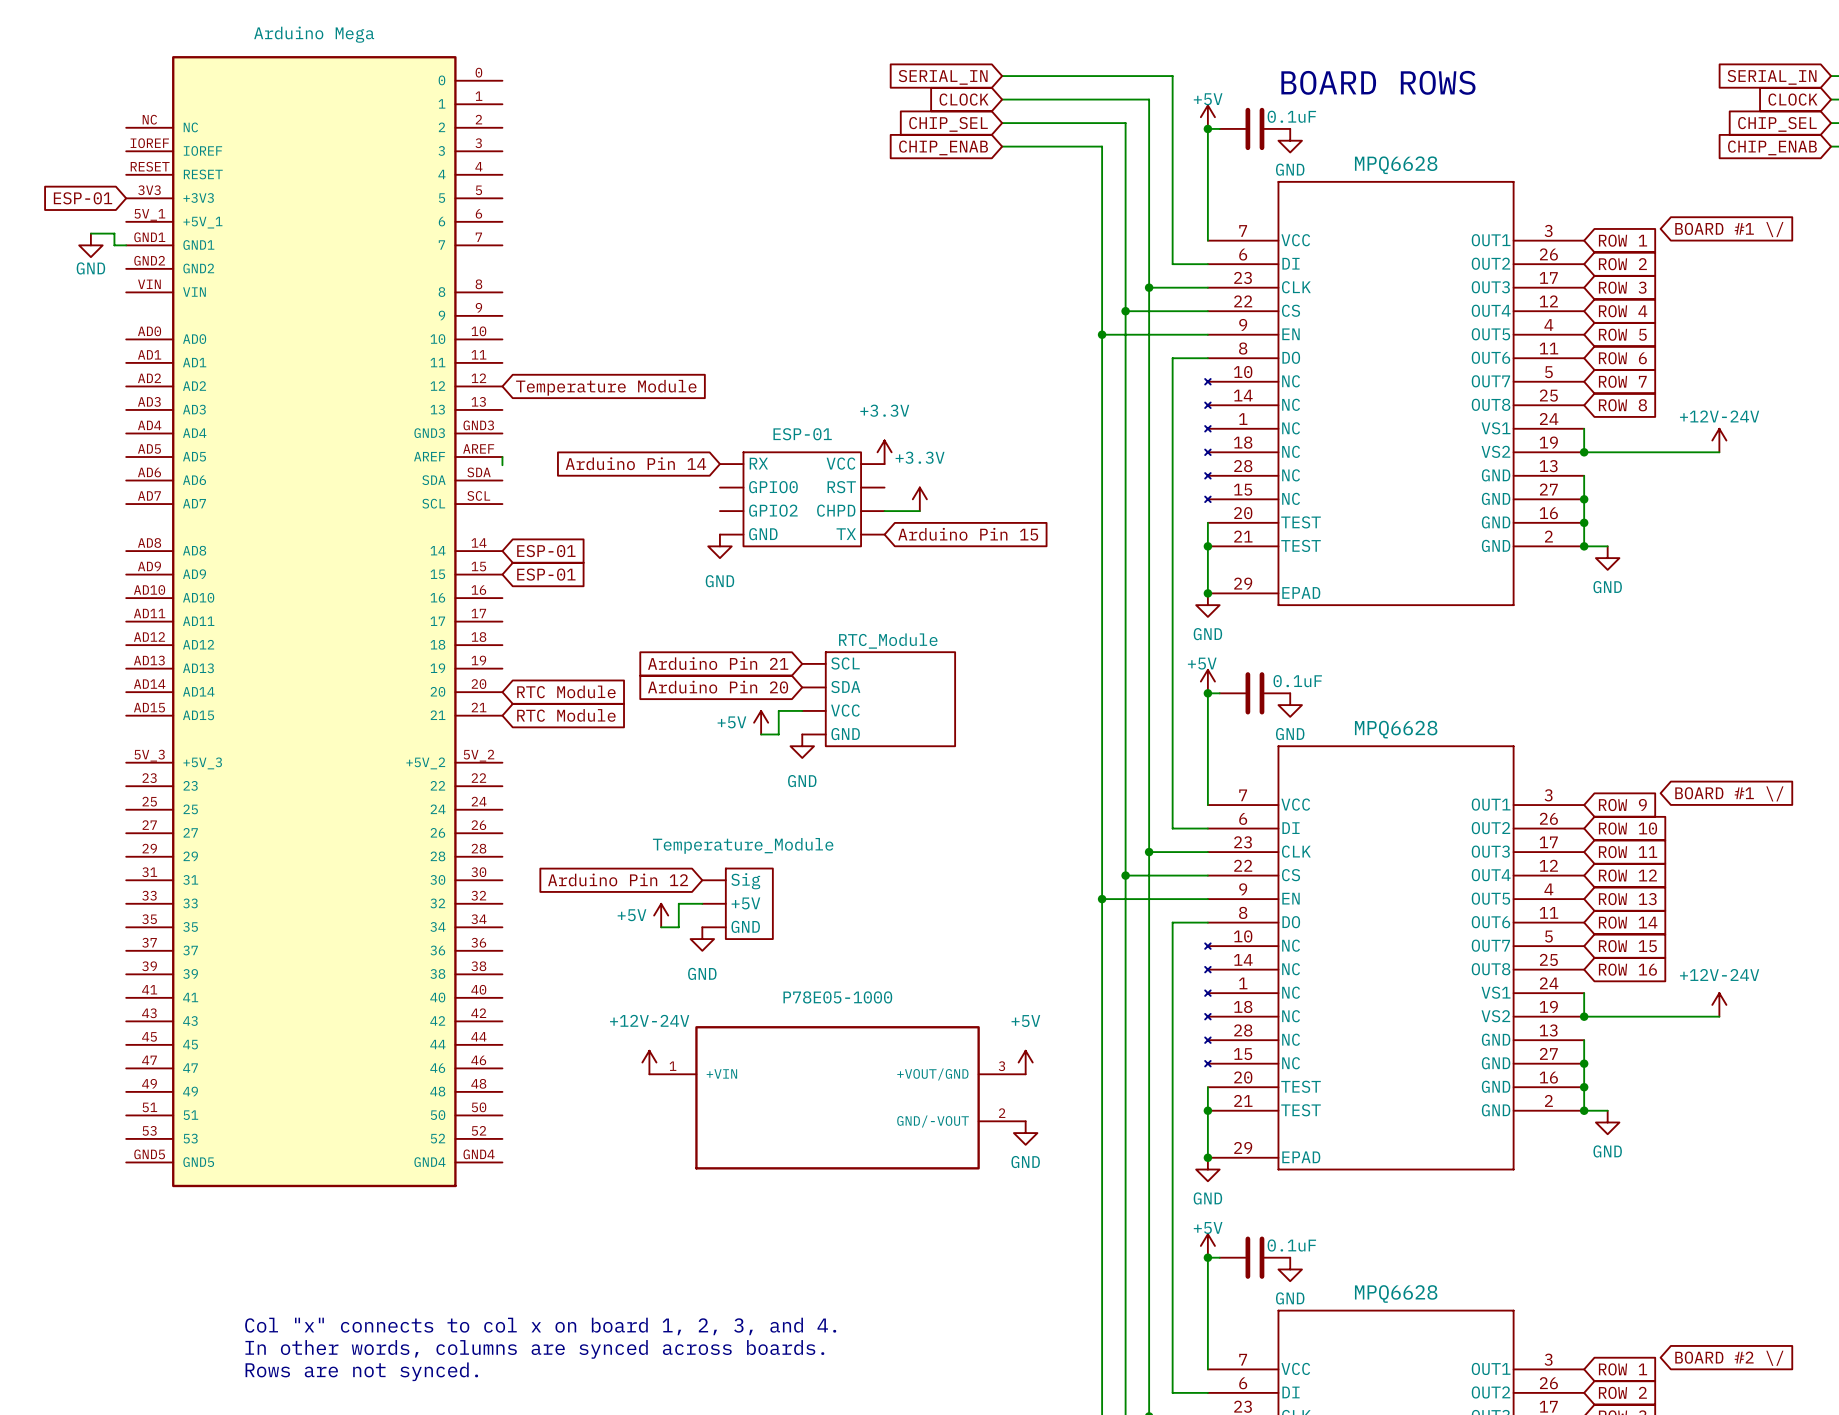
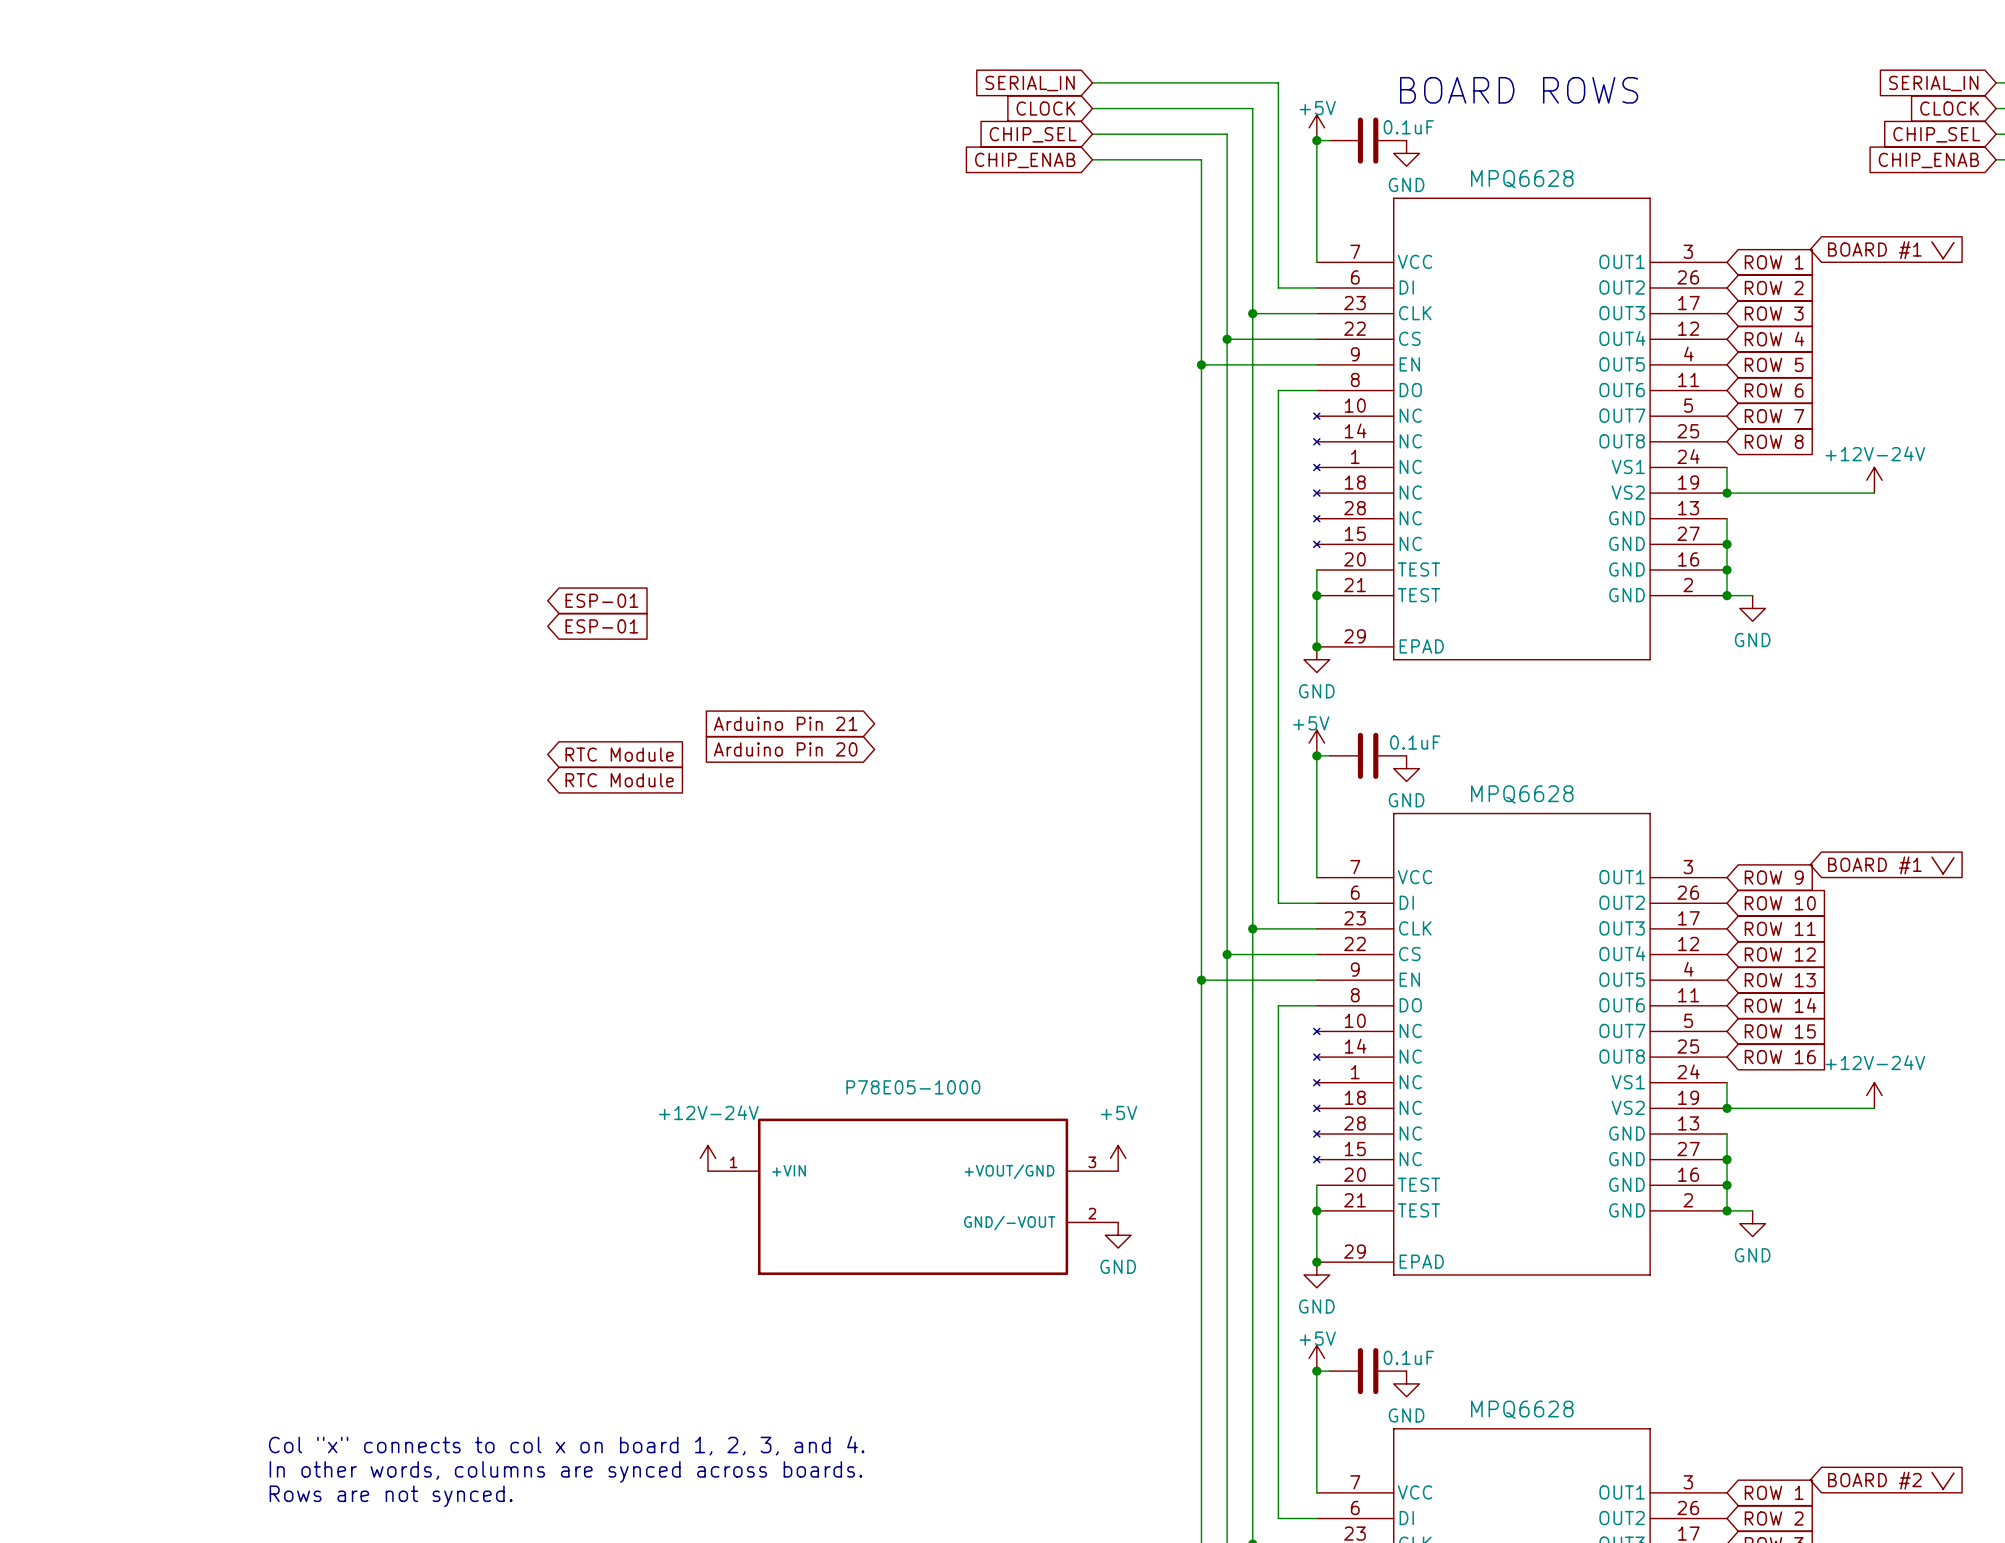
global label: ESP-01 (83, 198) -> none
wire: (90, 233) (114, 233) (114, 245) (126, 245) -> none
power symbol: GND (90, 245) -> none
global label: Temperature Module (606, 387) -> none
power symbol: +3.3V (884, 452) -> none
wire: (502, 457) (502, 465) -> none
global label: Arduino Pin 14 (635, 463) -> none
part: ESP-01 (802, 499) -> none
power symbol: +3.3V (919, 499) -> none
wire: (884, 511) (919, 511) -> none
global label: Arduino Pin 15 (968, 534) -> none
power symbol: GND (719, 546) -> none
part: Arduino Mega (314, 621) -> none
part: RTC_Module (878, 699) -> none
wire: (802, 710) (778, 710) (778, 734) (761, 734) -> none
power symbol: +5V (761, 722) -> none
power symbol: GND (802, 746) -> none
global label: Arduino Pin 12 (618, 879) -> none
wire: (702, 903) (678, 903) (678, 927) (661, 927) -> none
part: Temperature_Module (737, 903) -> none
power symbol: +5V (661, 915) -> none
power symbol: GND (702, 939) -> none

